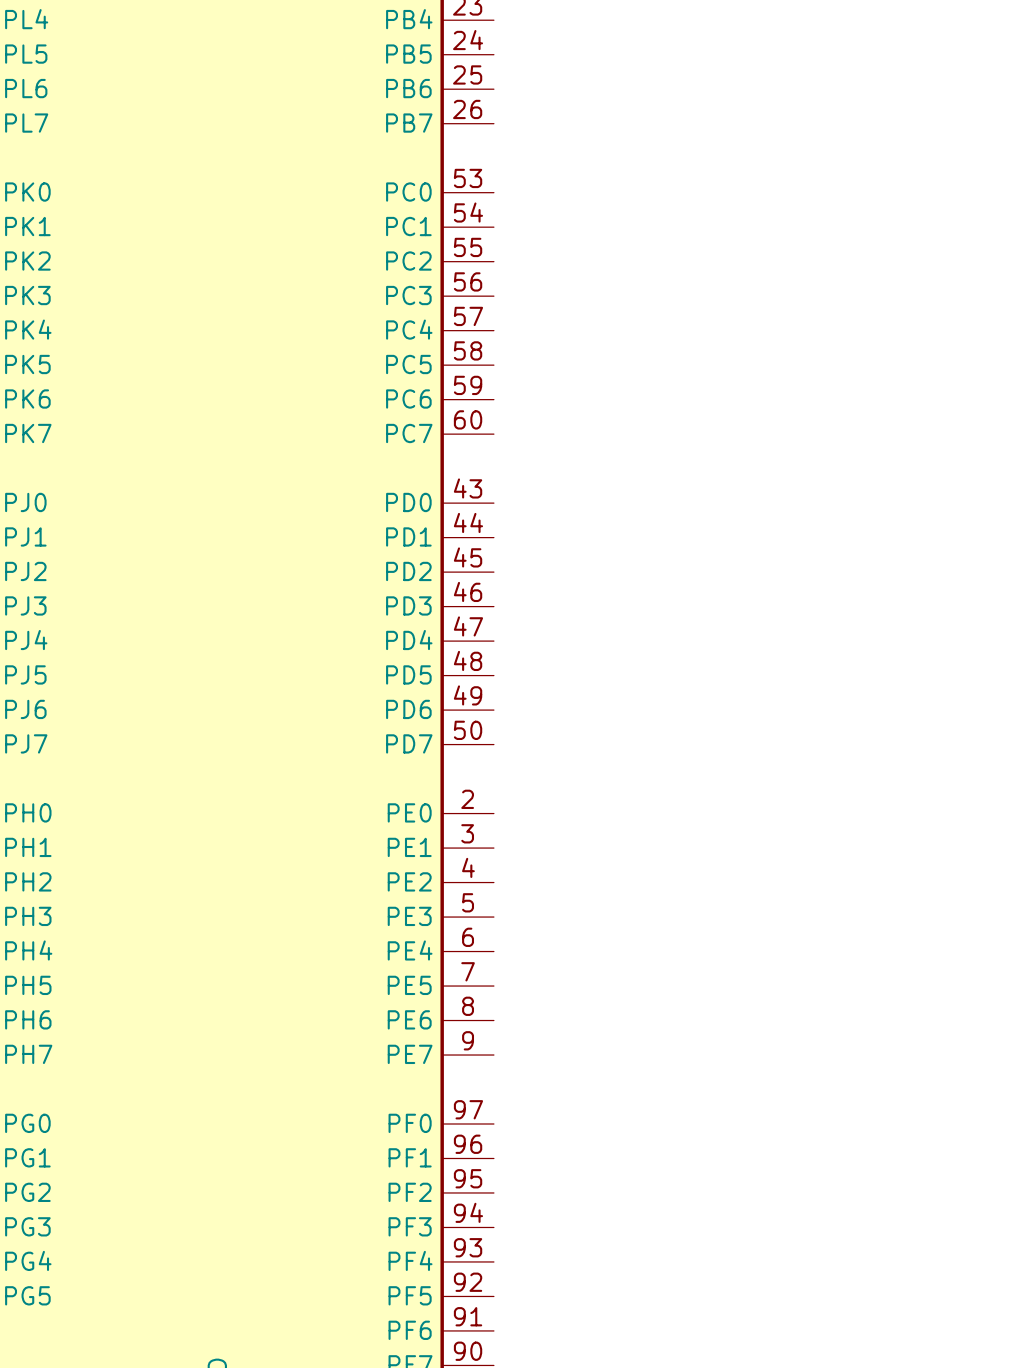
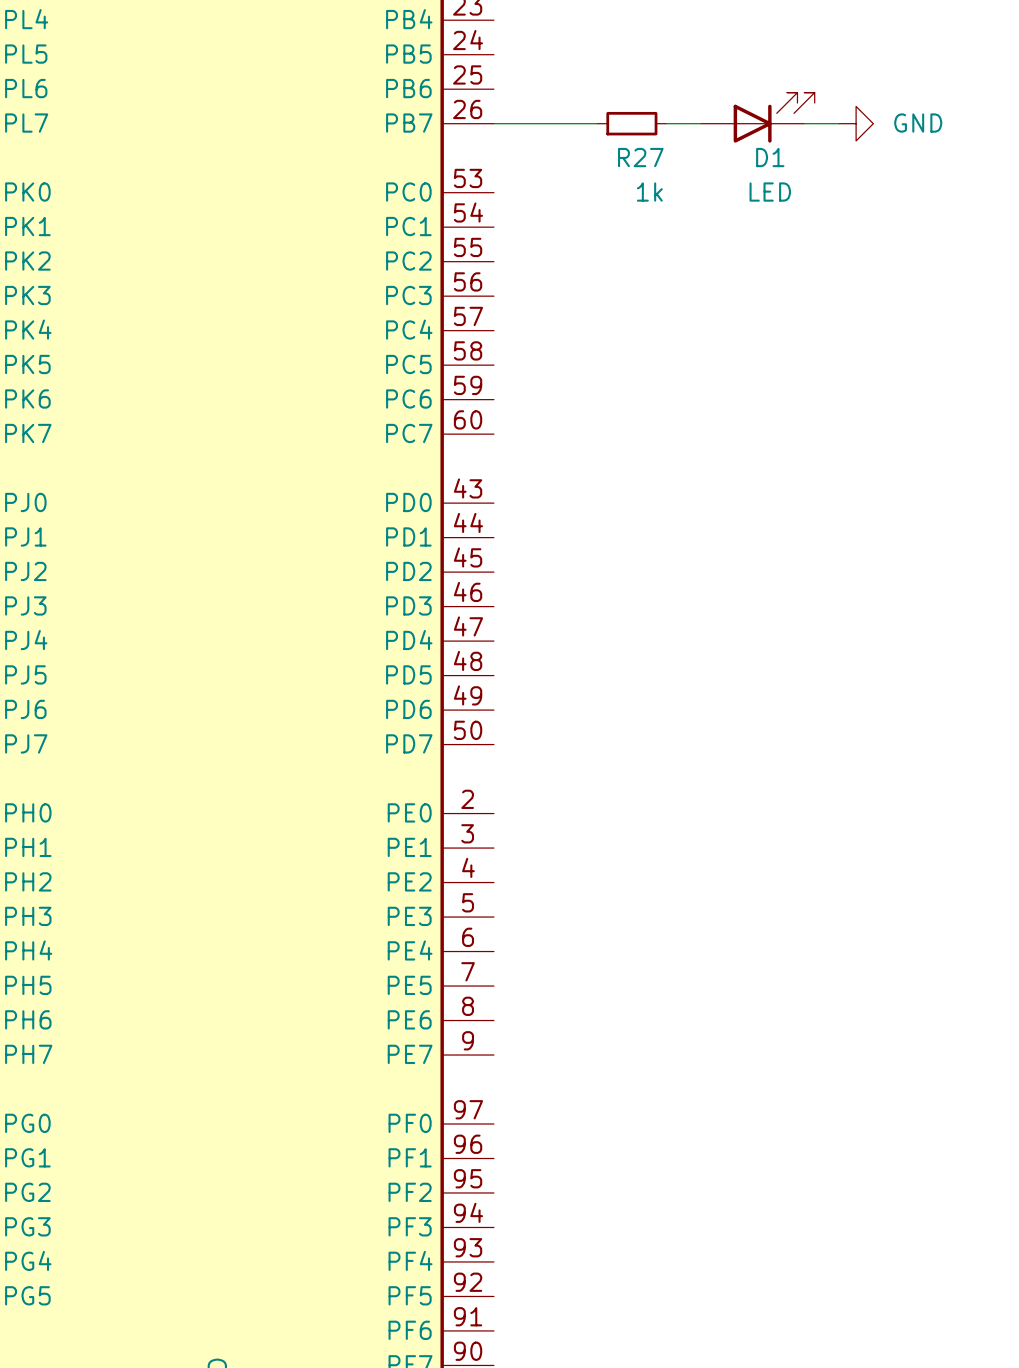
D1: none -> LED (757, 117)
wire: none -> (493, 123) (597, 123)
R27: none -> 1k (631, 123)
wire: none -> (666, 123) (700, 123)
wire: none -> (804, 123) (838, 123)
power symbol: none -> GND (856, 123)

